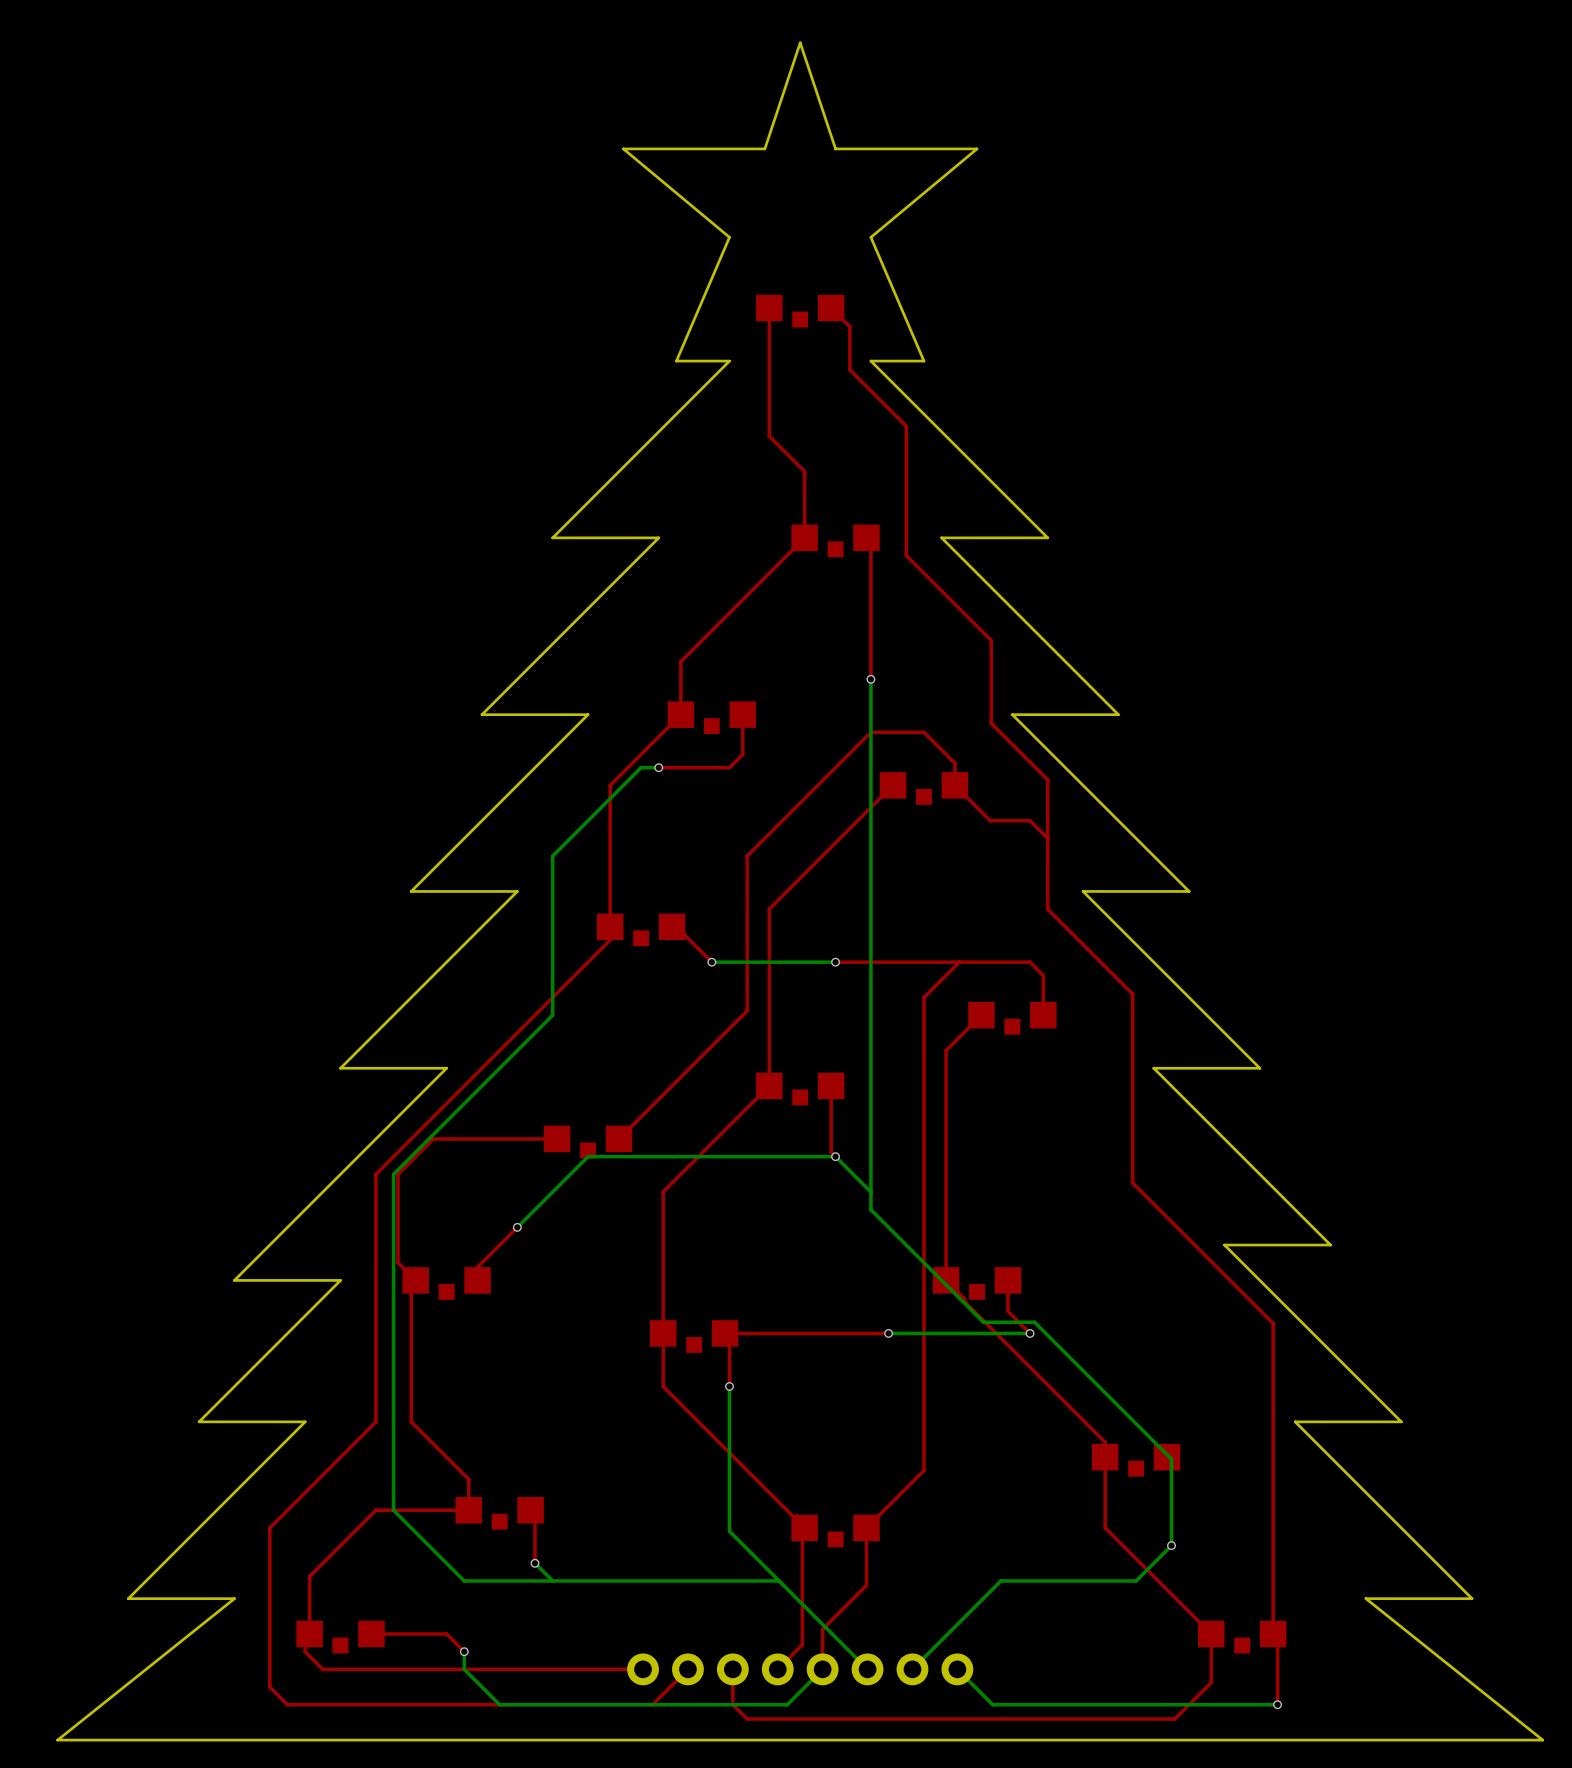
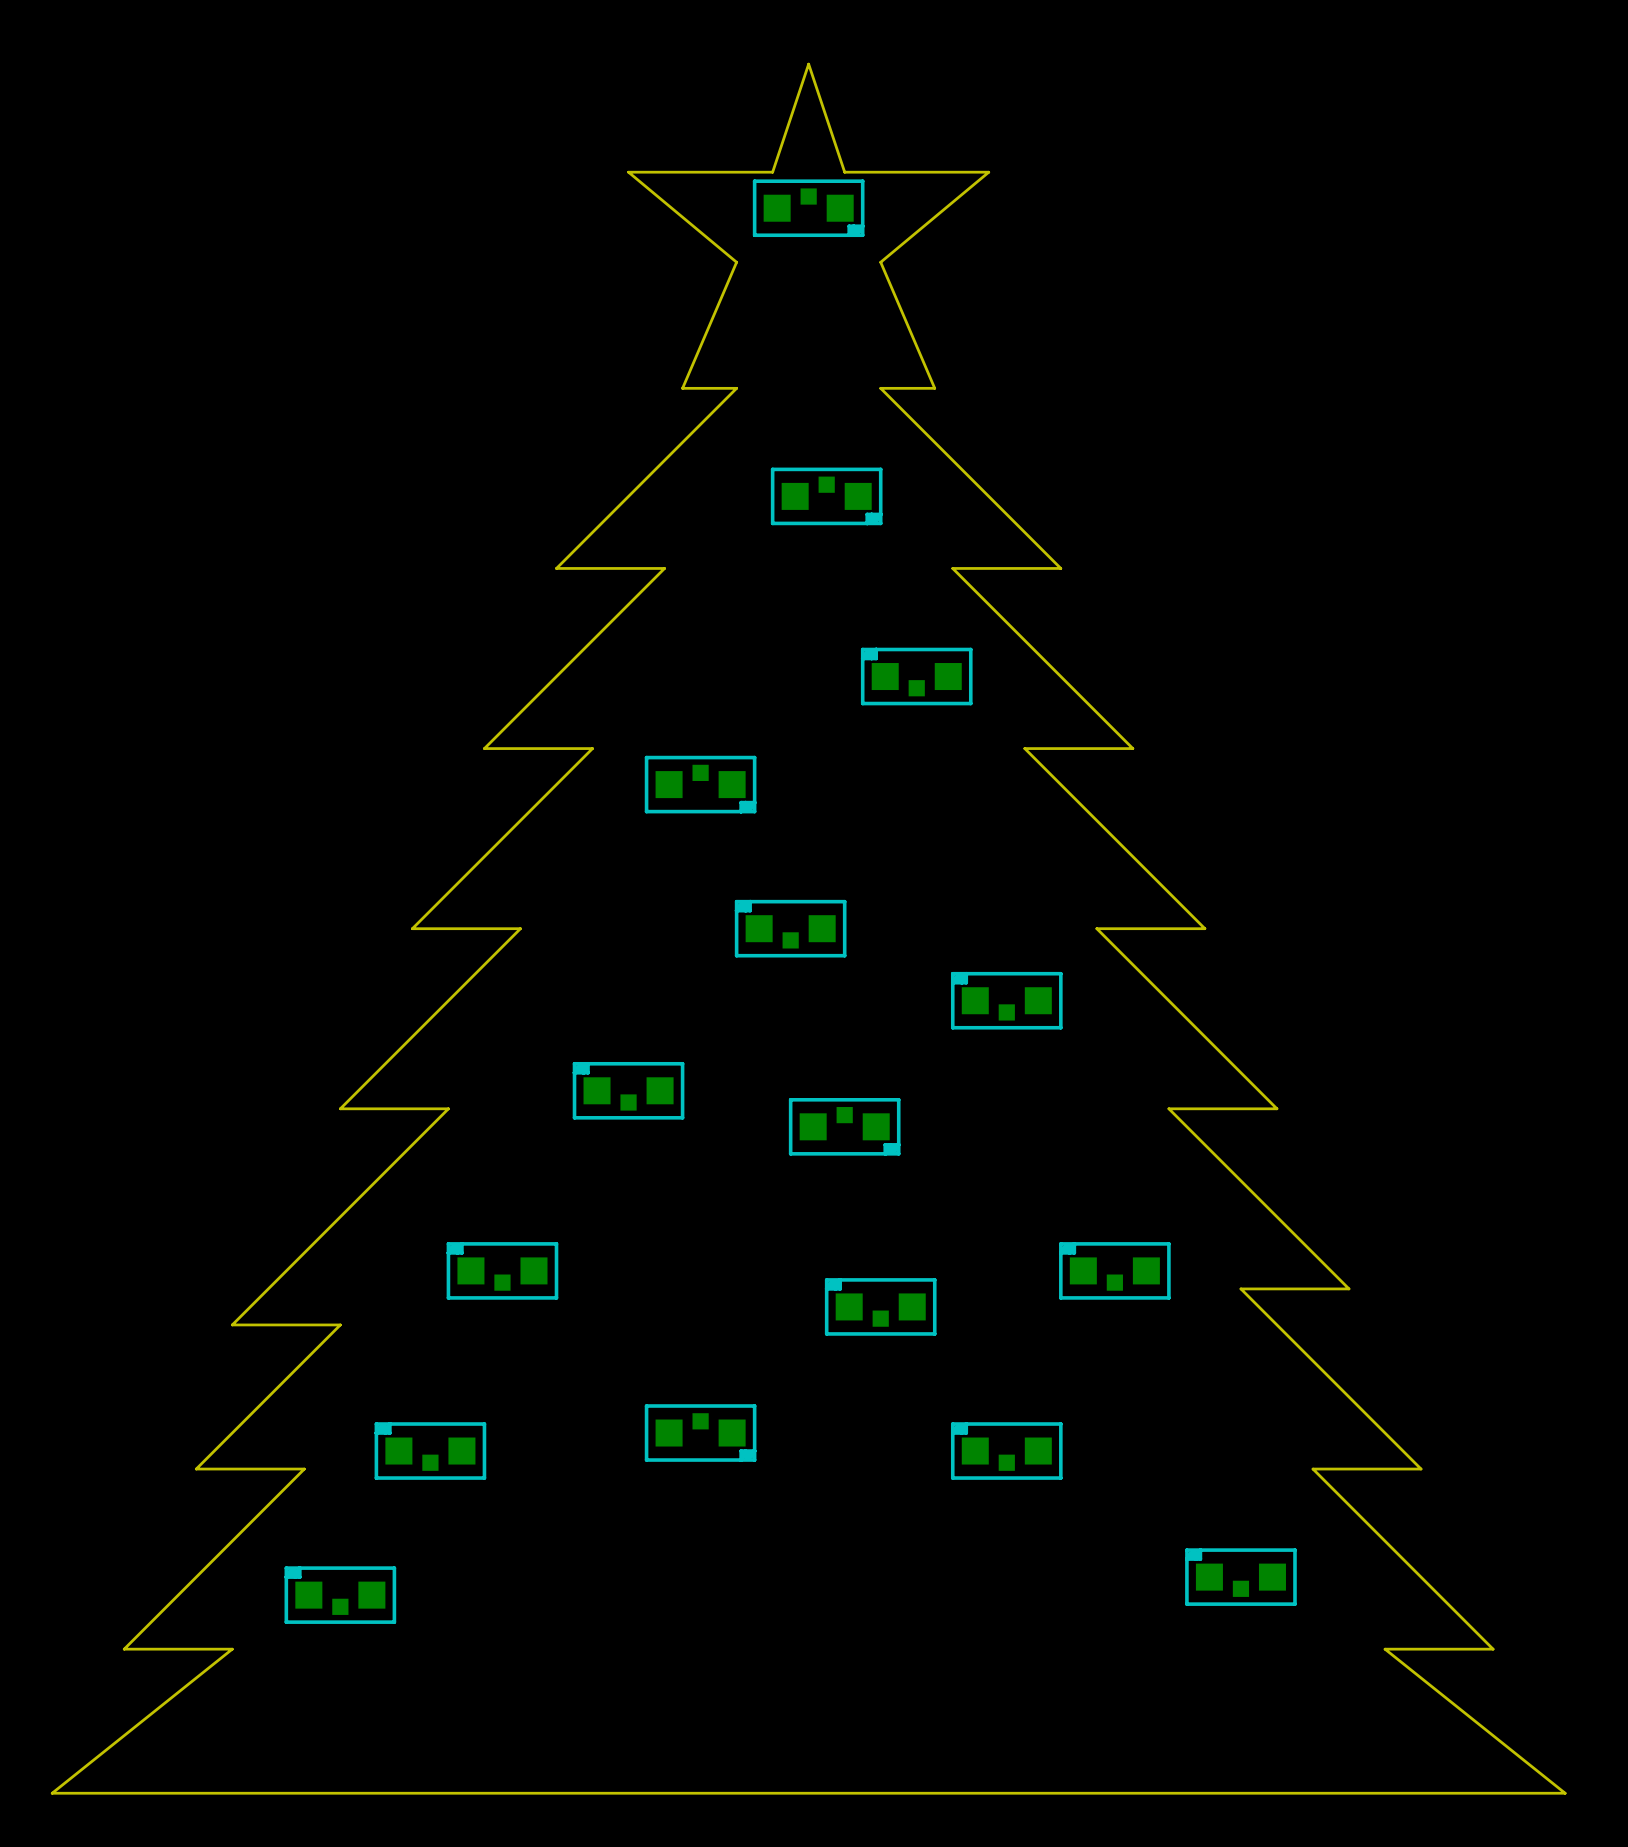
part: none -> (808, 208)
top track: (769, 308) (769, 436) (804, 471) (804, 537) (680, 661) (680, 714) (610, 785) (610, 940) (375, 1174) (375, 1421) (269, 1527) (269, 1687) (287, 1704) (652, 1704) (687, 1669) -> none
top track: (831, 308) (849, 326) (849, 369) (906, 426) (906, 555) (991, 640) (991, 723) (1047, 779) (1047, 909) (1132, 994) (1132, 1183) (1273, 1323) (1273, 1634) (1277, 1638) (1277, 1704) -> none
part: (800, 311) -> none
part: none -> (826, 496)
top track: (866, 537) (870, 542) (870, 679) -> none
part: (835, 540) -> none
bottom track: (870, 679) (870, 1209) (983, 1322) (1034, 1322) (1171, 1459) (1171, 1545) (1136, 1580) (1000, 1580) (912, 1669) -> none
via: (870, 679) -> none
top track: (742, 714) (742, 754) (729, 767) (658, 767) -> none
part side: top (711, 717) -> bottom (916, 676)
bottom track: (658, 767) (641, 767) (552, 856) (552, 1015) (393, 1174) (393, 1510) (464, 1580) (779, 1580) -> none
via: (658, 767) -> none
top track: (893, 785) (769, 909) (769, 1085) (663, 1192) (663, 1386) (804, 1527) -> none
part: (923, 788) -> none
top track: (1047, 838) (1030, 820) (990, 820) (954, 785) (954, 763) (923, 732) (870, 732) (747, 856) (747, 1010) (618, 1138) -> none
top track: (672, 926) (676, 926) (711, 962) -> none
part side: top (641, 929) -> bottom (790, 928)
via: (711, 962) -> none
top track: (835, 962) (1030, 962) (1043, 975) (1043, 1015) -> none
bottom track: (835, 962) (711, 962) -> none
via: (835, 962) -> none
top track: (959, 962) (923, 997) (923, 1470) (866, 1527) (866, 1585) (822, 1629) (822, 1669) -> none
part: none -> (1006, 1000)
top track: (981, 1015) (946, 1050) (946, 1280) (964, 1298) (964, 1301) (1105, 1442) (1105, 1527) (1211, 1634) (1211, 1682) (1174, 1719) (747, 1719) (732, 1704) (732, 1669) -> none
part side: top (1012, 1018) -> bottom (1114, 1270)
part: none -> (628, 1090)
top track: (831, 1085) (831, 1152) (835, 1156) -> none
part: none -> (844, 1126)
part side: top (800, 1089) -> bottom (502, 1270)
top track: (557, 1138) (433, 1138) (397, 1174) (397, 1262) (415, 1280) (411, 1284) (411, 1421) (468, 1479) (468, 1510) (375, 1510) (309, 1576) (309, 1634) (305, 1638) (305, 1651) (322, 1669) (643, 1669) -> none
part side: top (588, 1142) -> bottom (700, 784)
via: (835, 1156) -> none
bottom track: (870, 1192) (835, 1156) (588, 1156) (517, 1227) -> none
top track: (517, 1227) (477, 1267) (477, 1280) -> none
via: (517, 1227) -> none
top track: (1007, 1280) (1007, 1311) (1030, 1333) -> none
part: (446, 1283) -> none
part side: top (977, 1283) -> bottom (1240, 1577)
top track: (888, 1333) (725, 1333) (729, 1337) (729, 1386) -> none
via: (888, 1333) -> none
bottom track: (1030, 1333) (888, 1333) -> none
via: (1030, 1333) -> none
part side: top (694, 1336) -> bottom (340, 1595)
bottom track: (729, 1386) (729, 1531) (867, 1669) -> none
via: (729, 1386) -> none
part: none -> (430, 1451)
part side: top (1136, 1460) -> bottom (880, 1306)
top track: (530, 1510) (535, 1514) (535, 1563) -> none
part: (499, 1513) -> none
top track: (802, 1525) (802, 1644) (777, 1669) -> none
part side: top (835, 1531) -> bottom (700, 1433)
via: (1171, 1545) -> none
bottom track: (535, 1563) (552, 1580) -> none
via: (535, 1563) -> none
top track: (371, 1634) (446, 1634) (464, 1651) -> none
part: (340, 1637) -> none
part side: top (1242, 1637) -> bottom (1006, 1451)
bottom track: (464, 1651) (464, 1669) (499, 1704) (787, 1704) (822, 1669) -> none
via: (464, 1651) -> none
part: (800, 1669) -> none
bottom track: (957, 1669) (992, 1704) (1277, 1704) -> none
via: (1277, 1704) -> none

